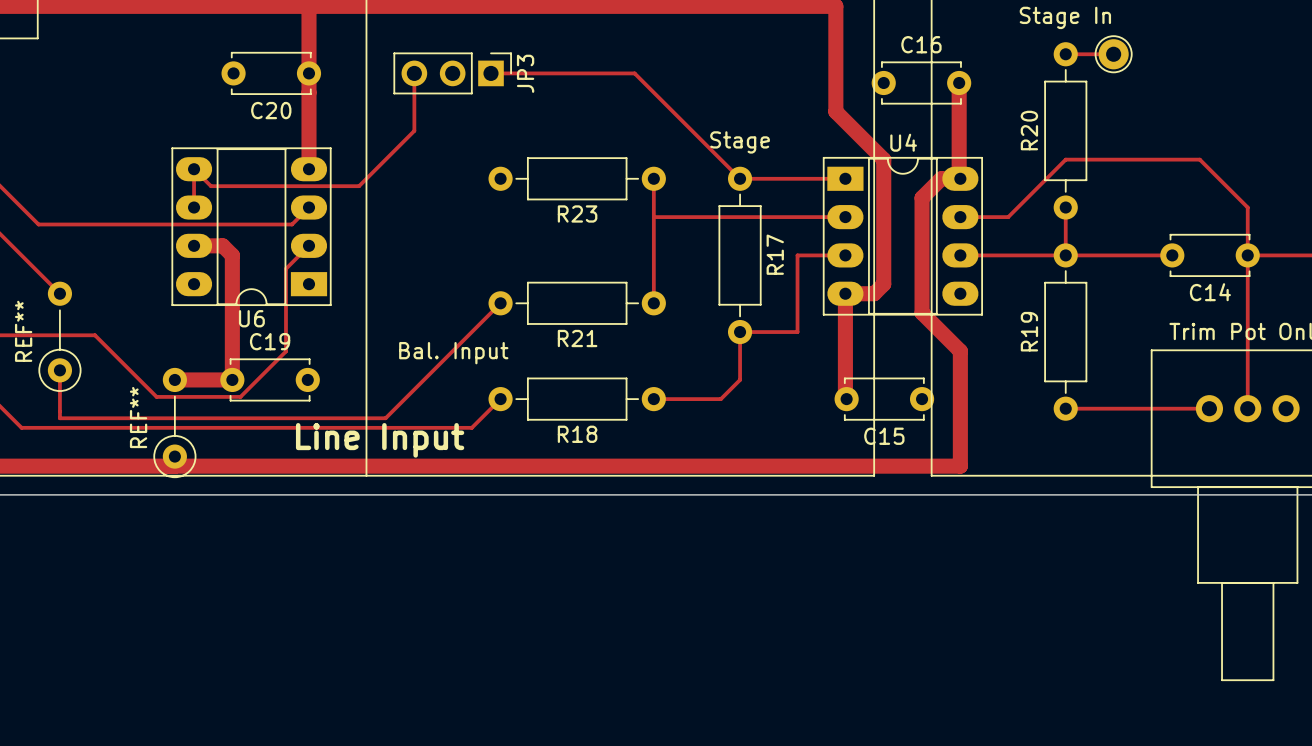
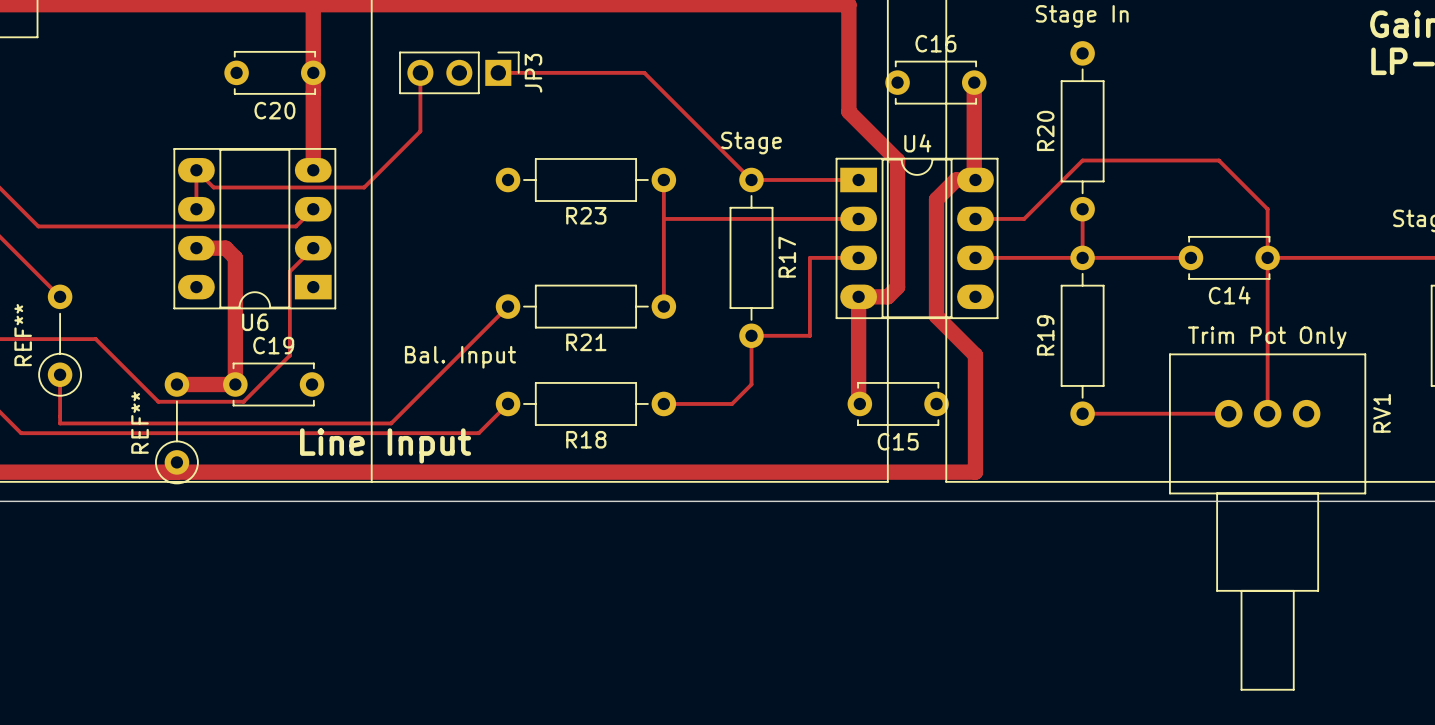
track: (1065, 54) (1113, 54) -> none
part: (1113, 54) -> none

